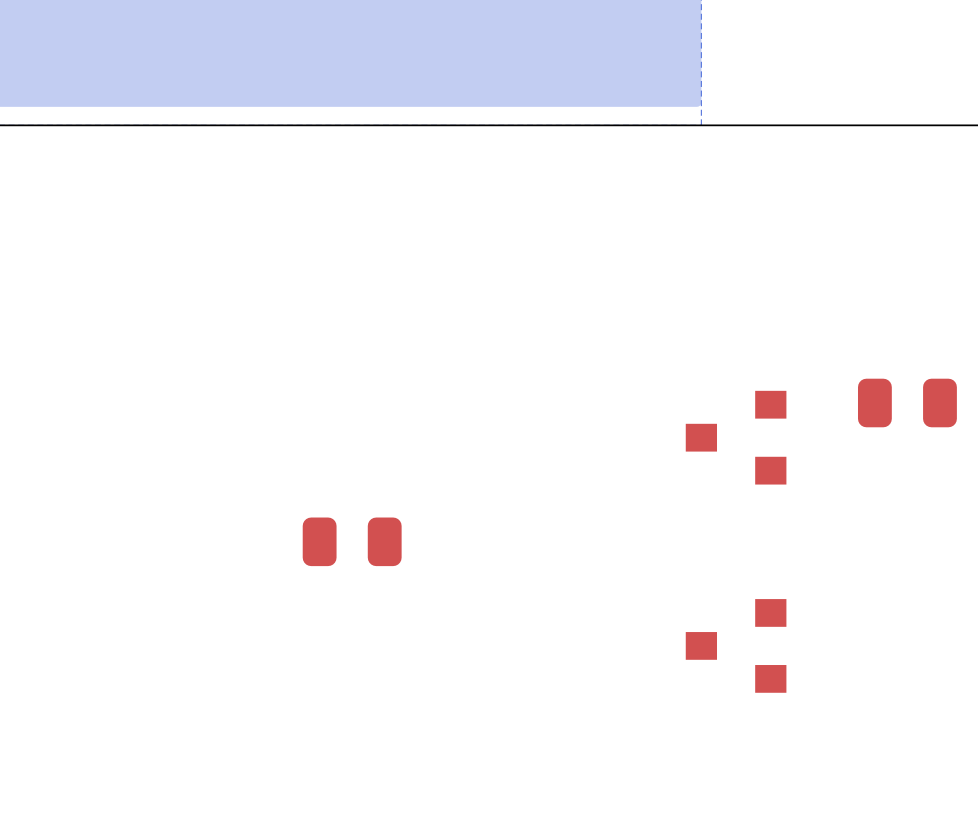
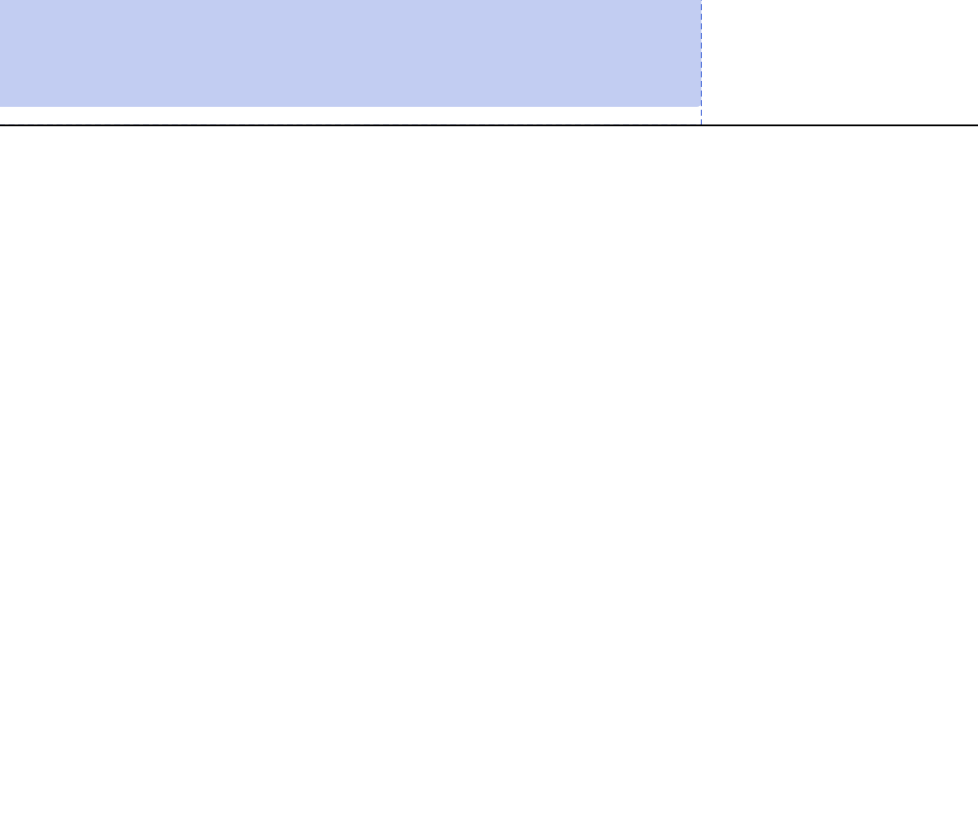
part: (907, 402) -> none
part: (736, 437) -> none
part: (352, 541) -> none
part: (736, 645) -> none

